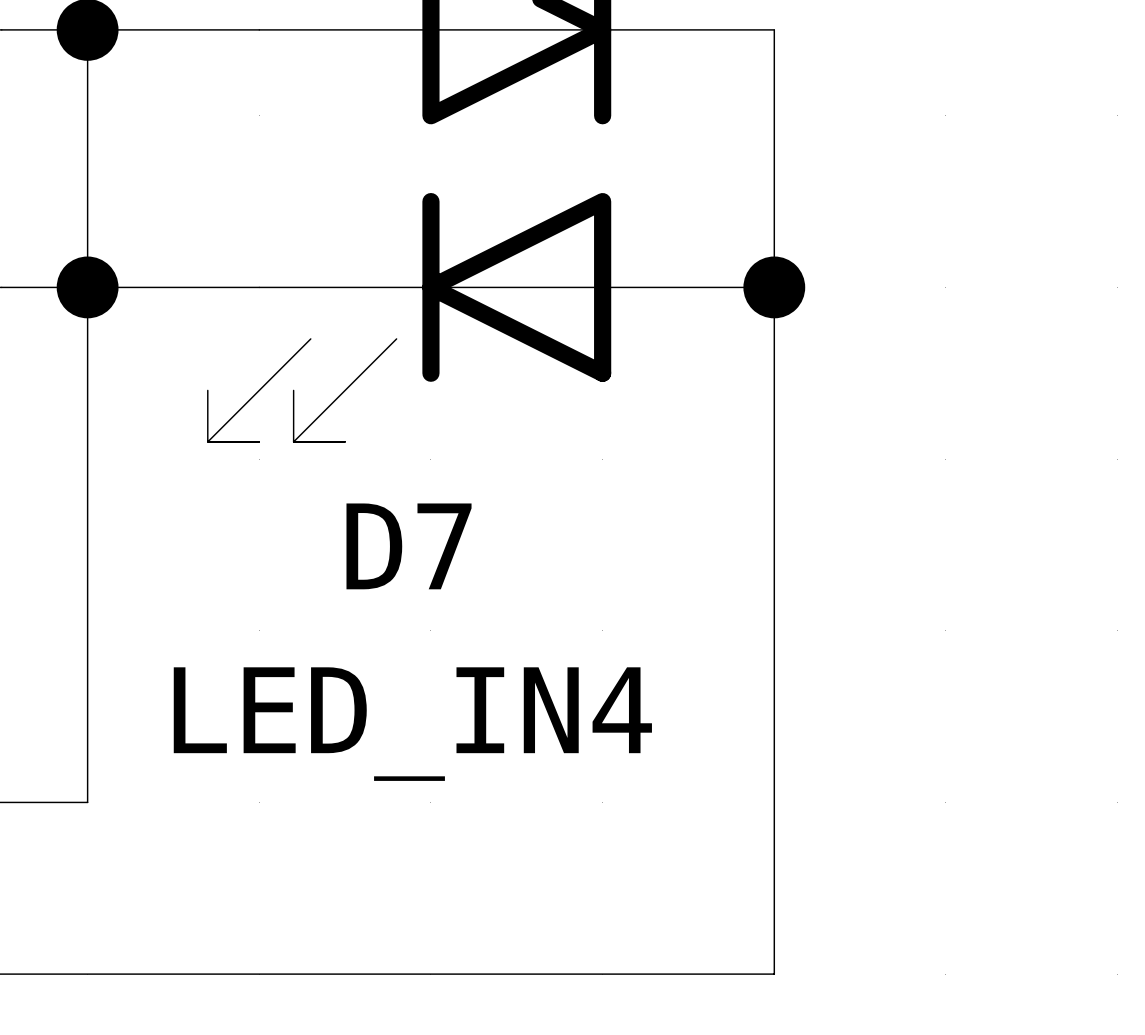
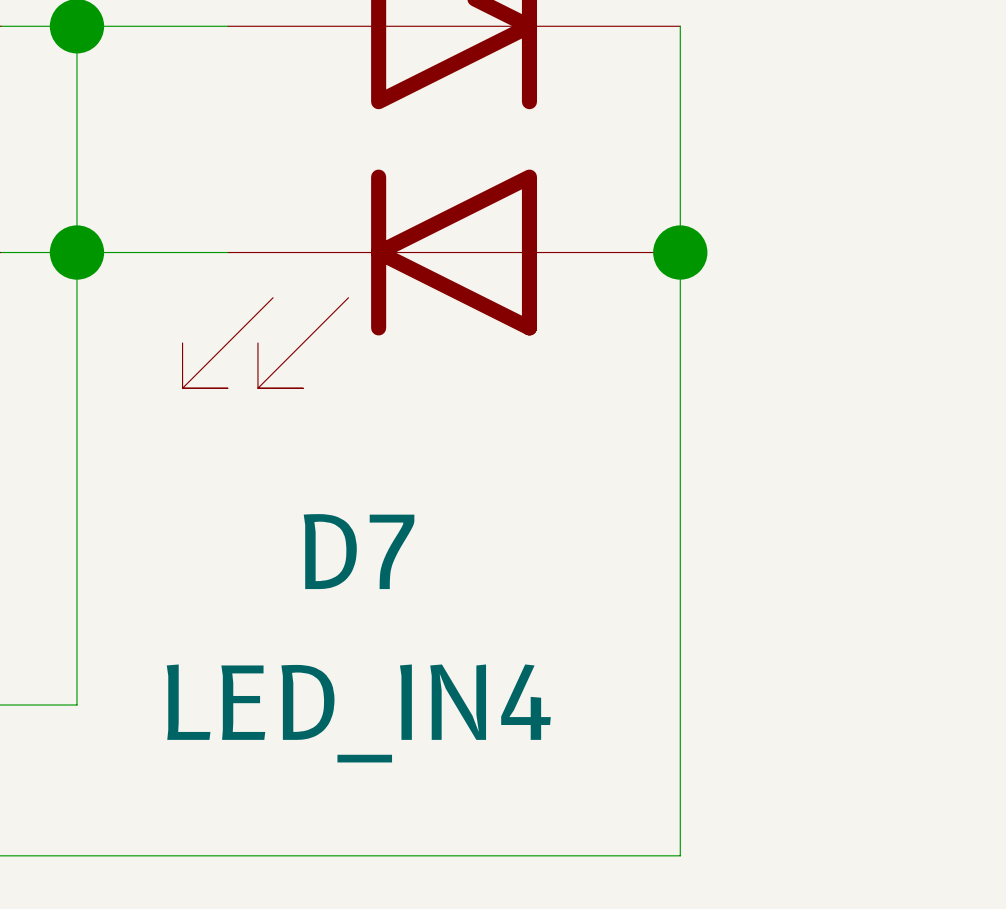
D7 name position: D7 (409, 546) -> D7 (359, 551)
D7 value position: LED_IN4 (412, 724) -> LED_IN4 (358, 713)

